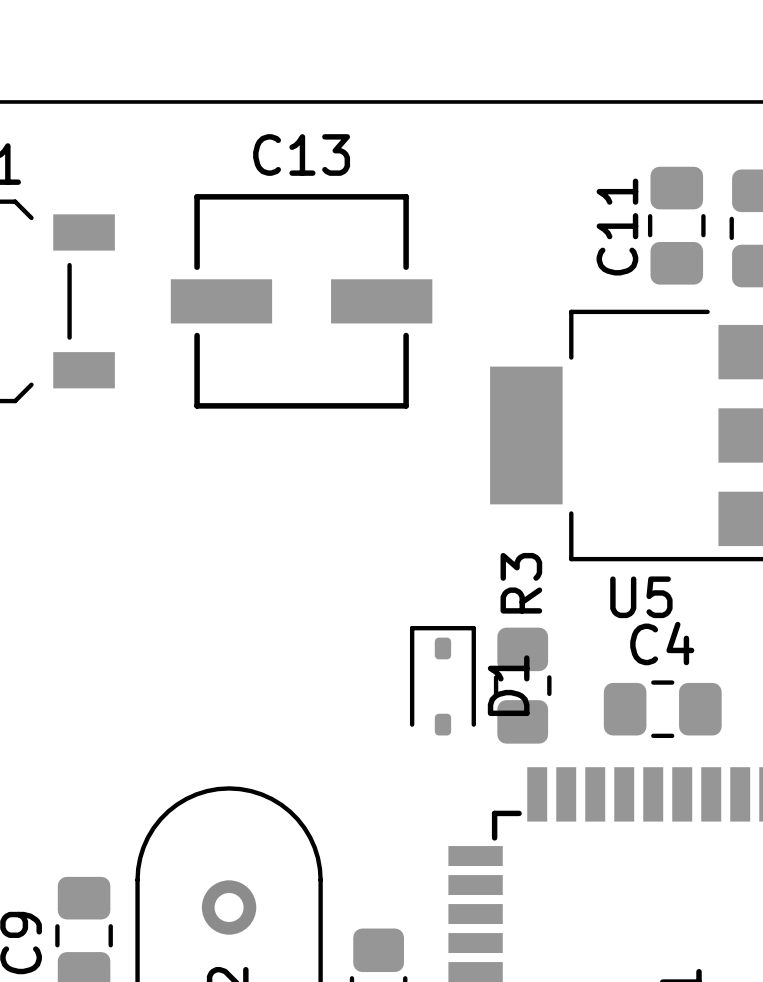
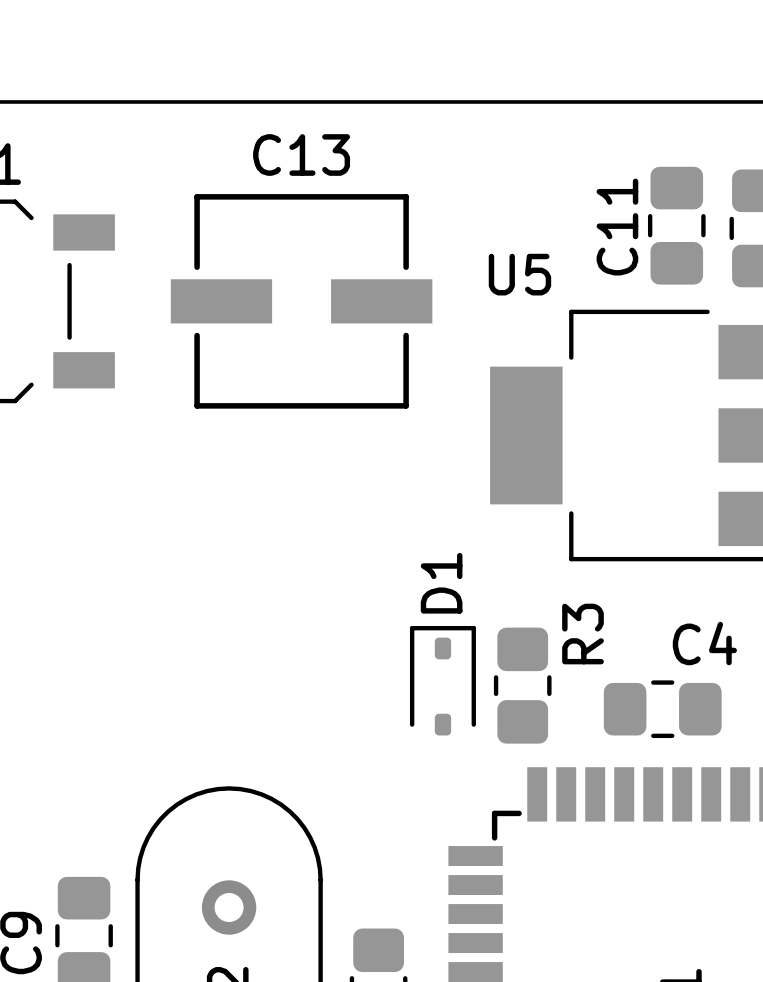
R3 name position: R3 (521, 583) -> R3 (582, 634)
U5 name position: U5 (641, 597) -> U5 (519, 274)
C4 name position: C4 (662, 643) -> C4 (704, 643)
D1 name position: D1 (508, 685) -> D1 (441, 583)

